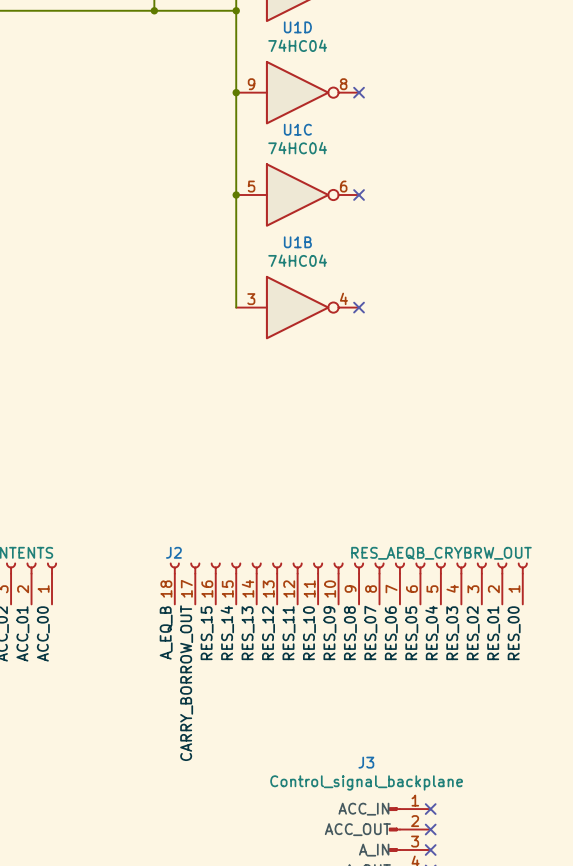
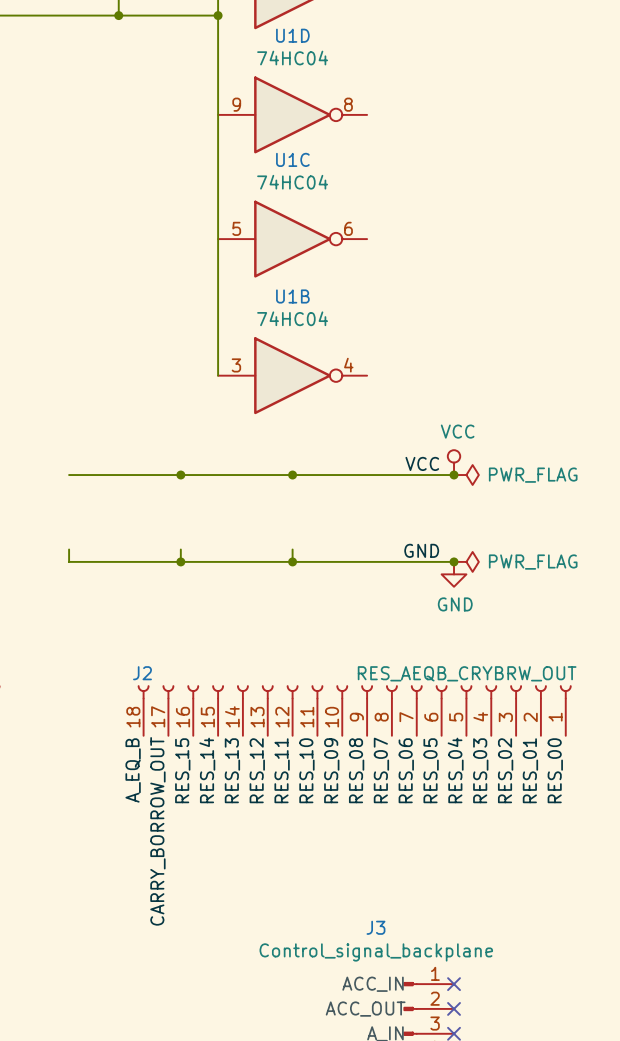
junction: (236, 92) -> none
no-connect mark: (359, 92) -> none
junction: (236, 195) -> none
no-connect mark: (359, 195) -> none
no-connect mark: (359, 307) -> none
power symbol: none -> VCC (454, 462)
label: none -> VCC (422, 463)
wire: none -> (69, 475) (454, 475)
junction: none -> (180, 475)
junction: none -> (292, 475)
junction: none -> (454, 475)
power symbol: none -> PWR_FLAG (466, 475)
wire: none -> (69, 549) (69, 561) (454, 561)
wire: none -> (180, 549) (180, 561)
wire: none -> (292, 549) (292, 561)
label: none -> GND (421, 550)
junction: none -> (180, 561)
junction: none -> (292, 561)
junction: none -> (454, 561)
power symbol: none -> PWR_FLAG (466, 561)
power symbol: none -> GND (454, 574)

